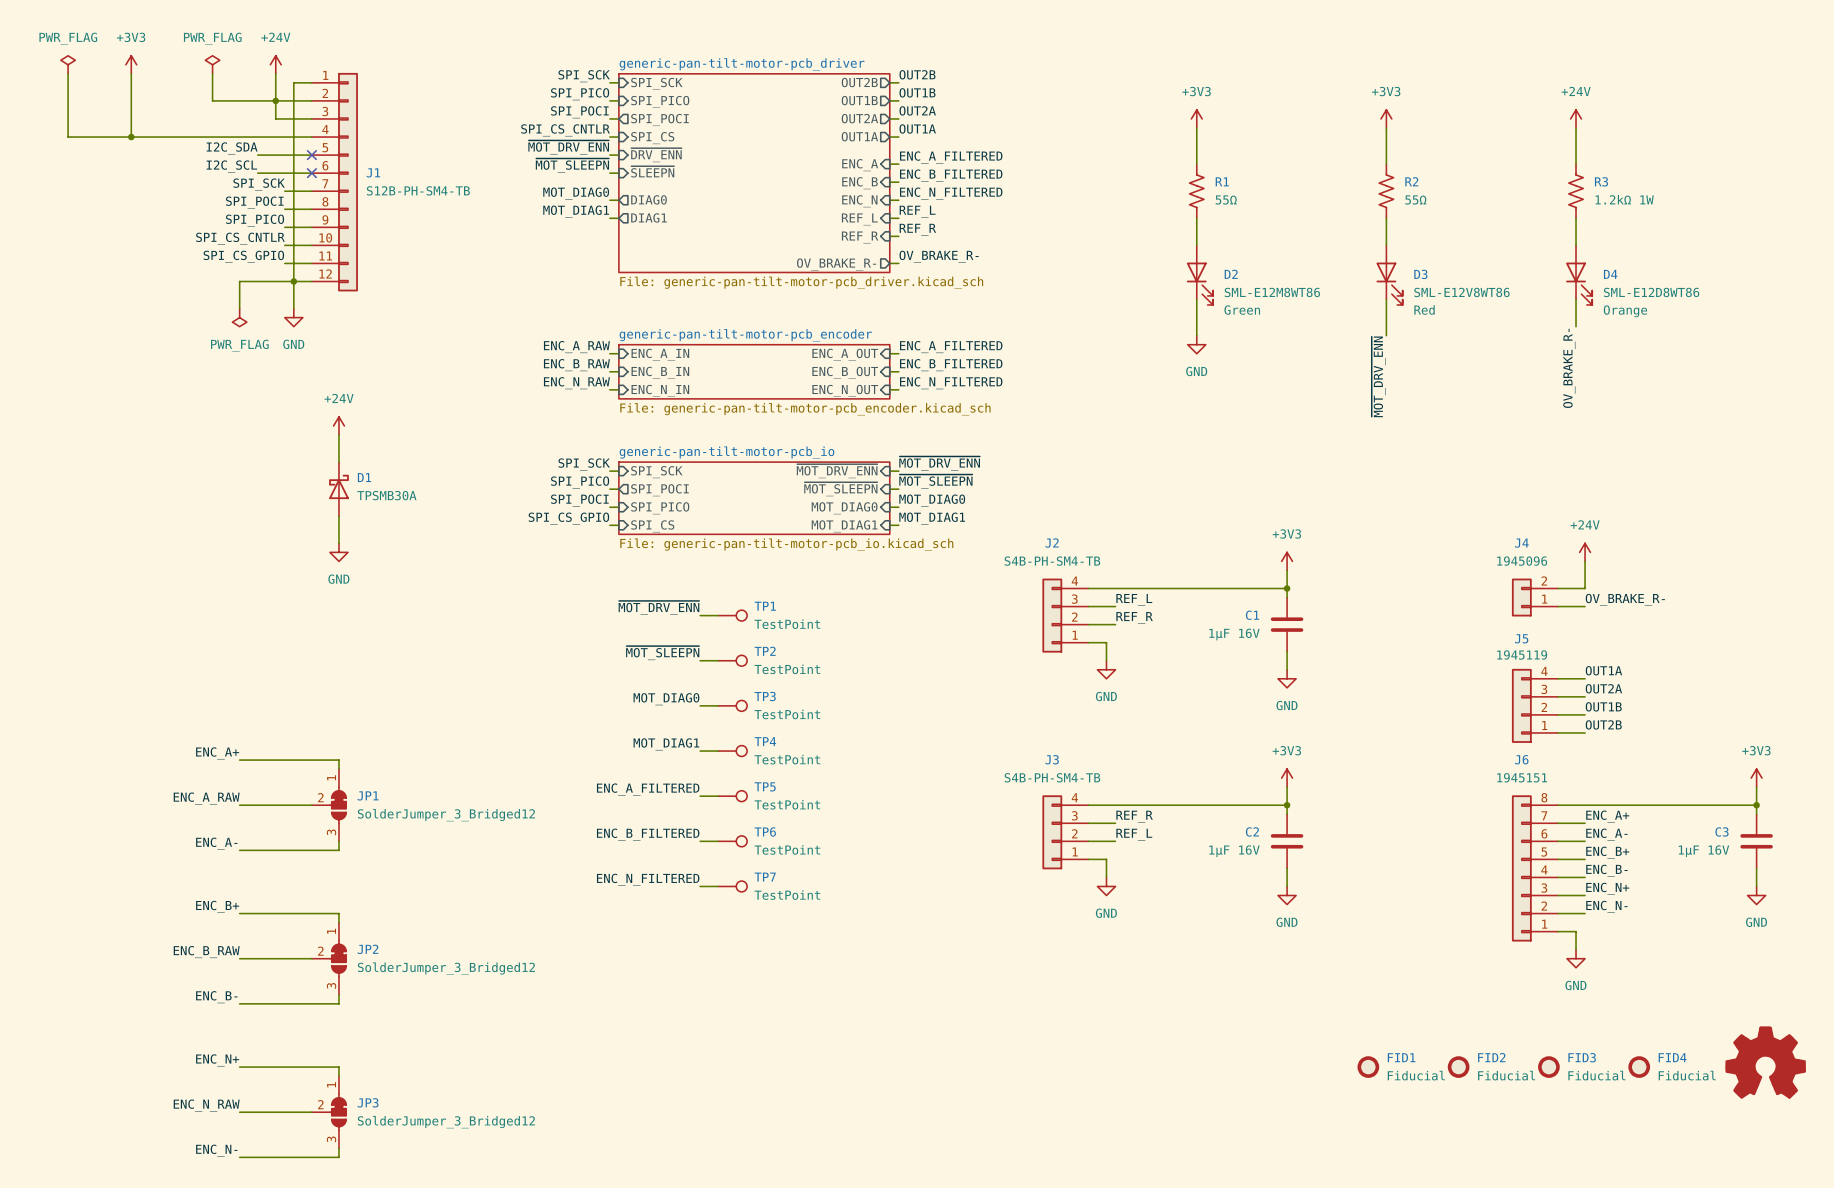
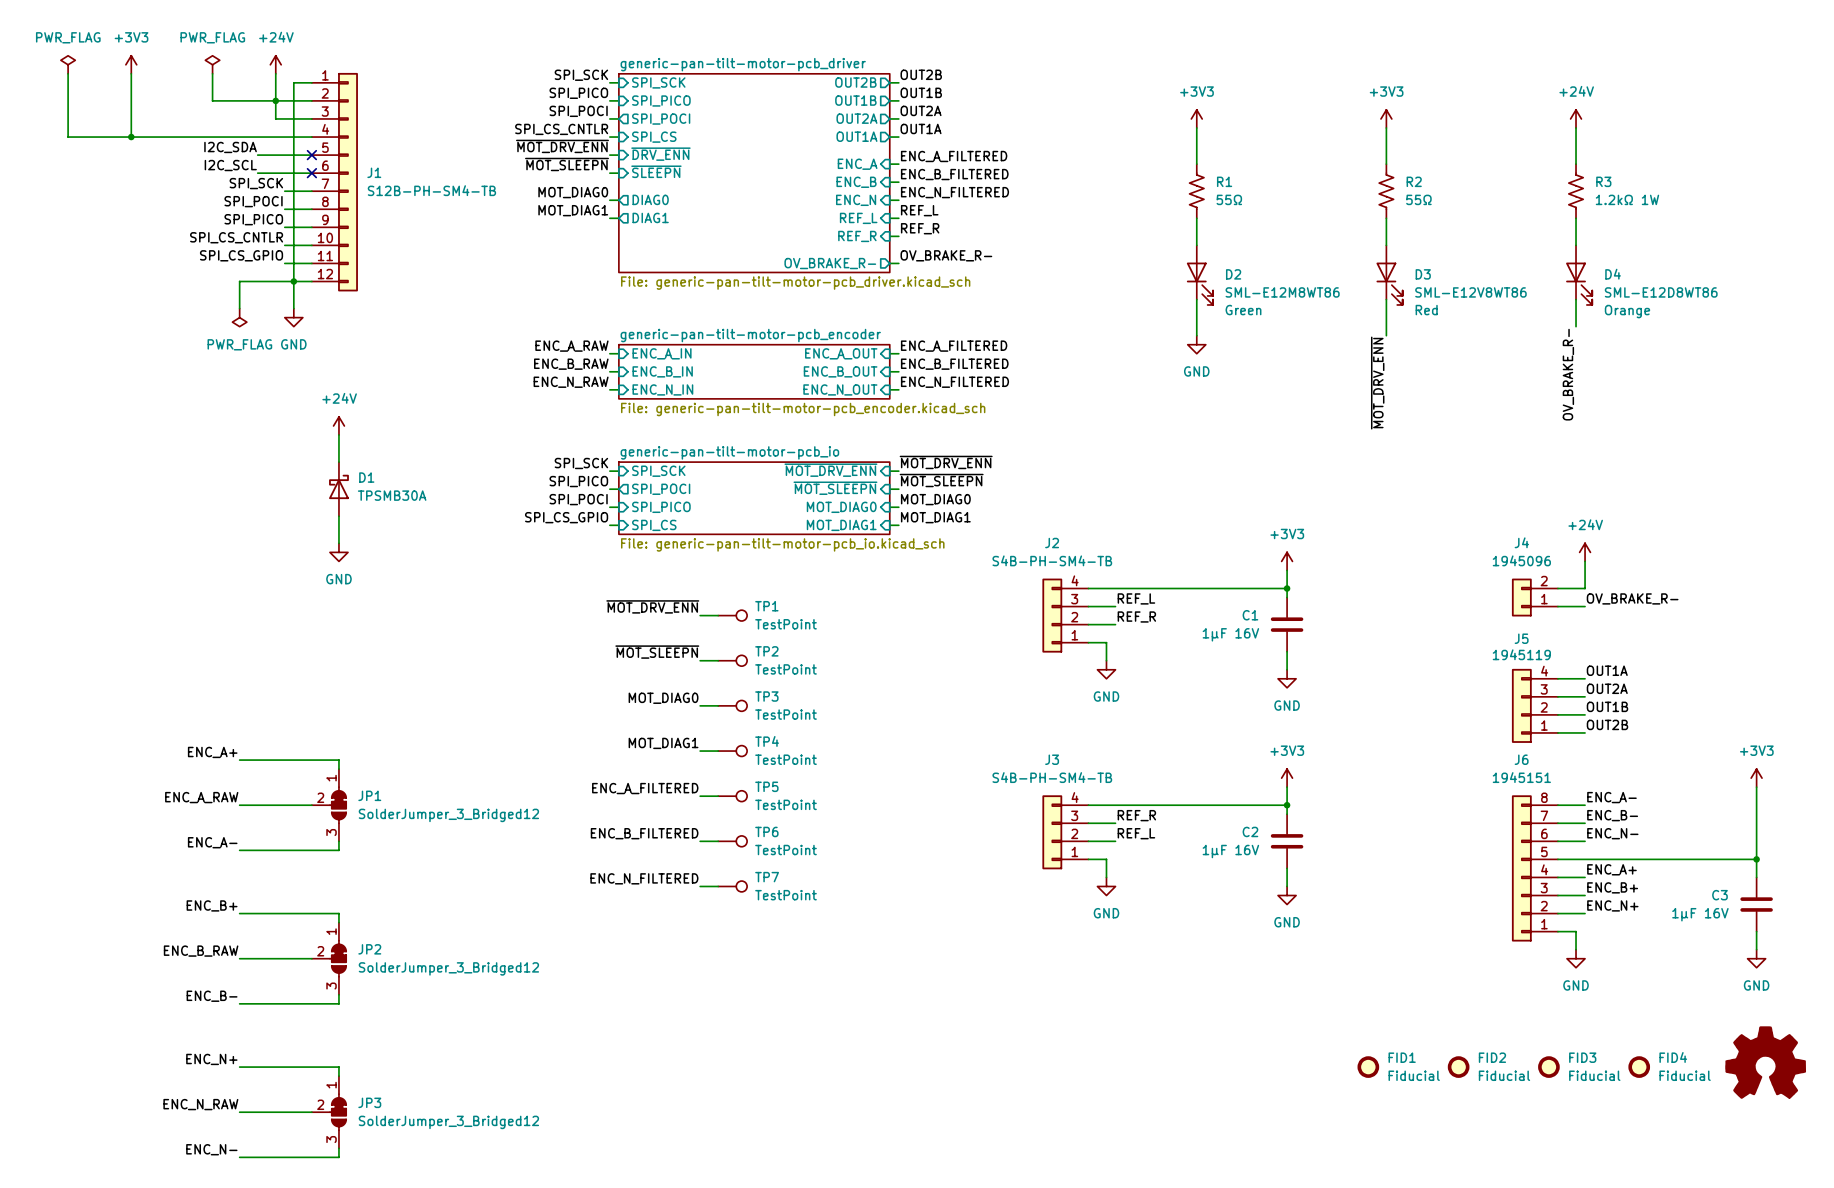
label: none -> ENC_A- (1611, 797)
wire: (1585, 805) (1756, 805) -> (1585, 859) (1756, 859)
junction: (1756, 805) -> none
label: ENC_A+ (1607, 816) -> ENC_B- (1612, 815)
label: ENC_A- (1606, 834) -> ENC_N- (1612, 833)
C3 position: (1756, 841) -> (1756, 904)
label: ENC_B+ (1607, 852) -> none
junction: none -> (1756, 859)
label: ENC_B- (1606, 870) -> ENC_A+ (1611, 869)
label: ENC_N+ (1607, 888) -> ENC_B+ (1612, 887)
power symbol position: GND (1756, 895) -> GND (1756, 958)
label: ENC_N- (1606, 906) -> ENC_N+ (1612, 905)
wire: none -> (1756, 931) (1756, 949)

